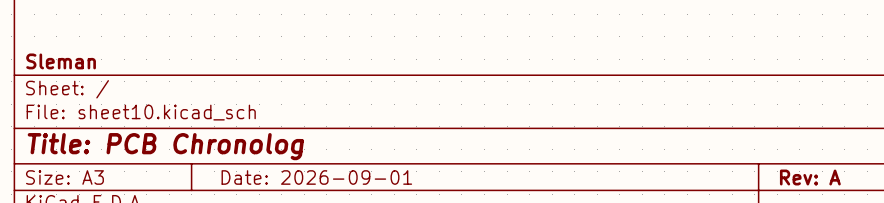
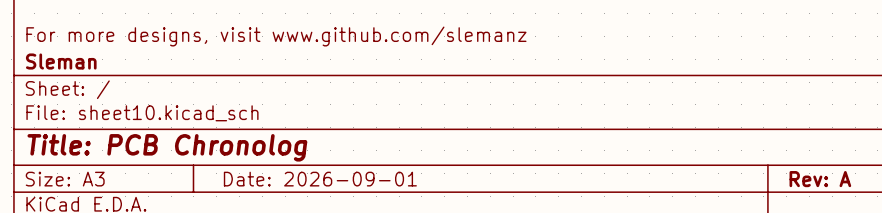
title block: none -> For more designs, visit www.github.com/slemanz (276, 36)

